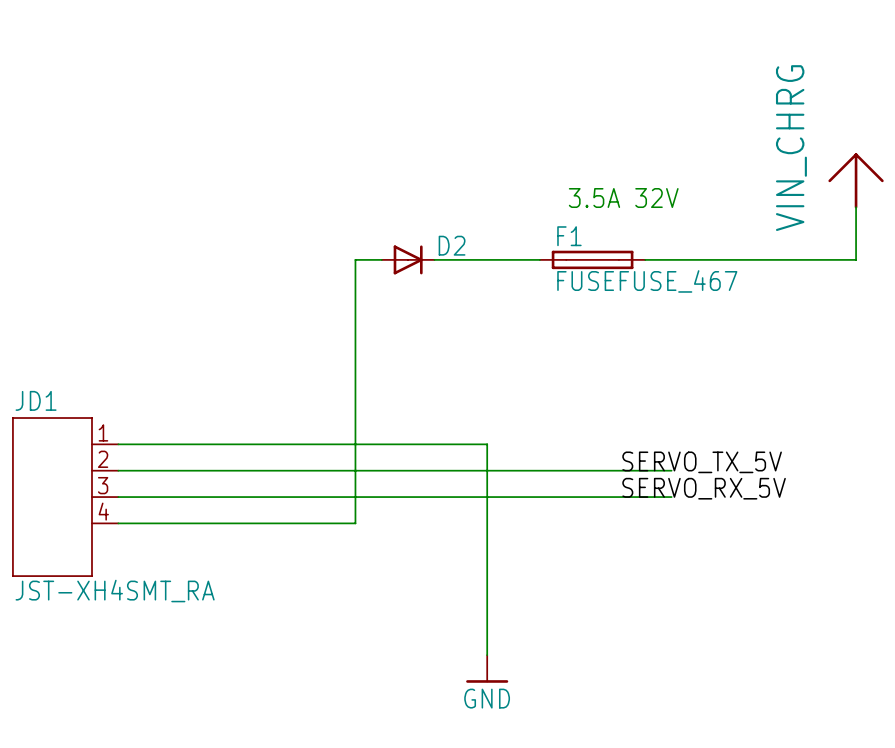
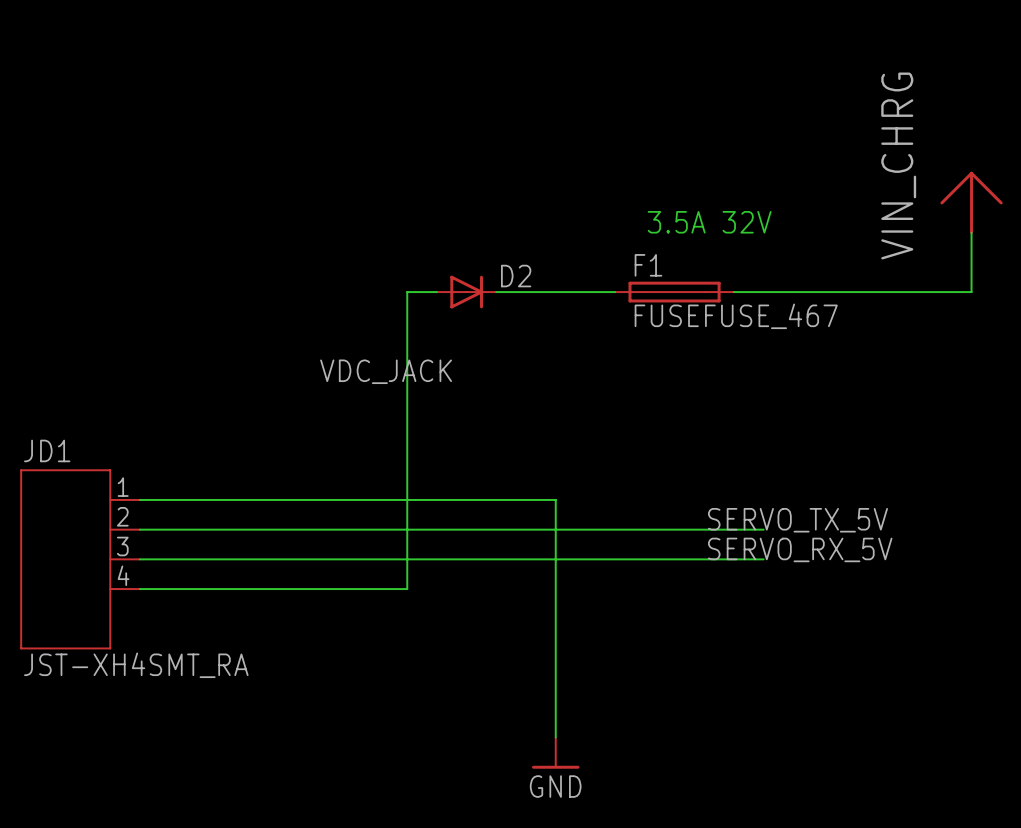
label: none -> VDC_JACK (386, 371)

